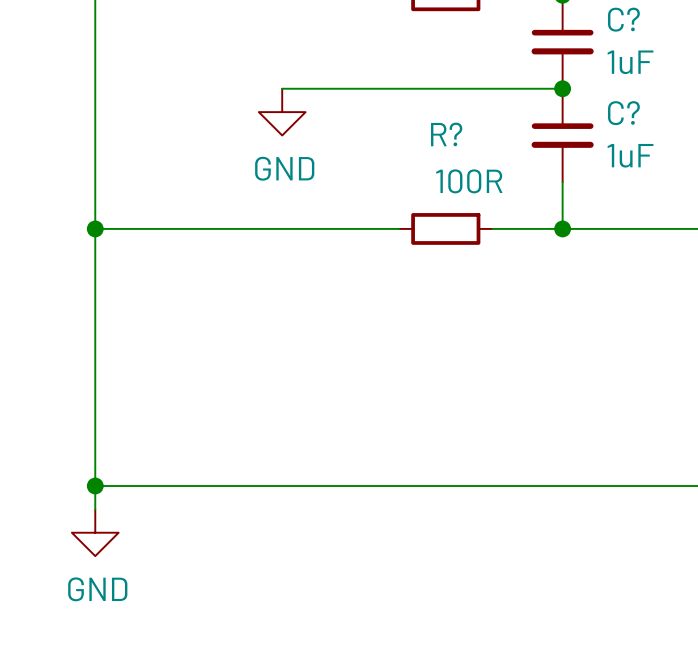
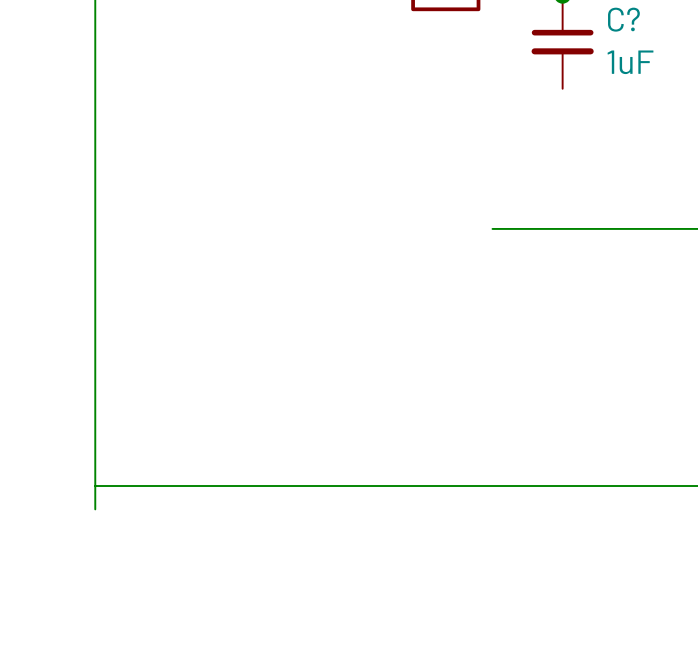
wire: (282, 88) (562, 88) -> none
junction: (562, 88) -> none
power symbol: GND (282, 112) -> none
C?: 1uF (562, 135) -> none
wire: (562, 182) (562, 228) -> none
wire: (95, 228) (399, 228) -> none
junction: (95, 228) -> none
R?: 100R (445, 228) -> none
junction: (562, 228) -> none
junction: (95, 486) -> none
power symbol: GND (95, 532) -> none

